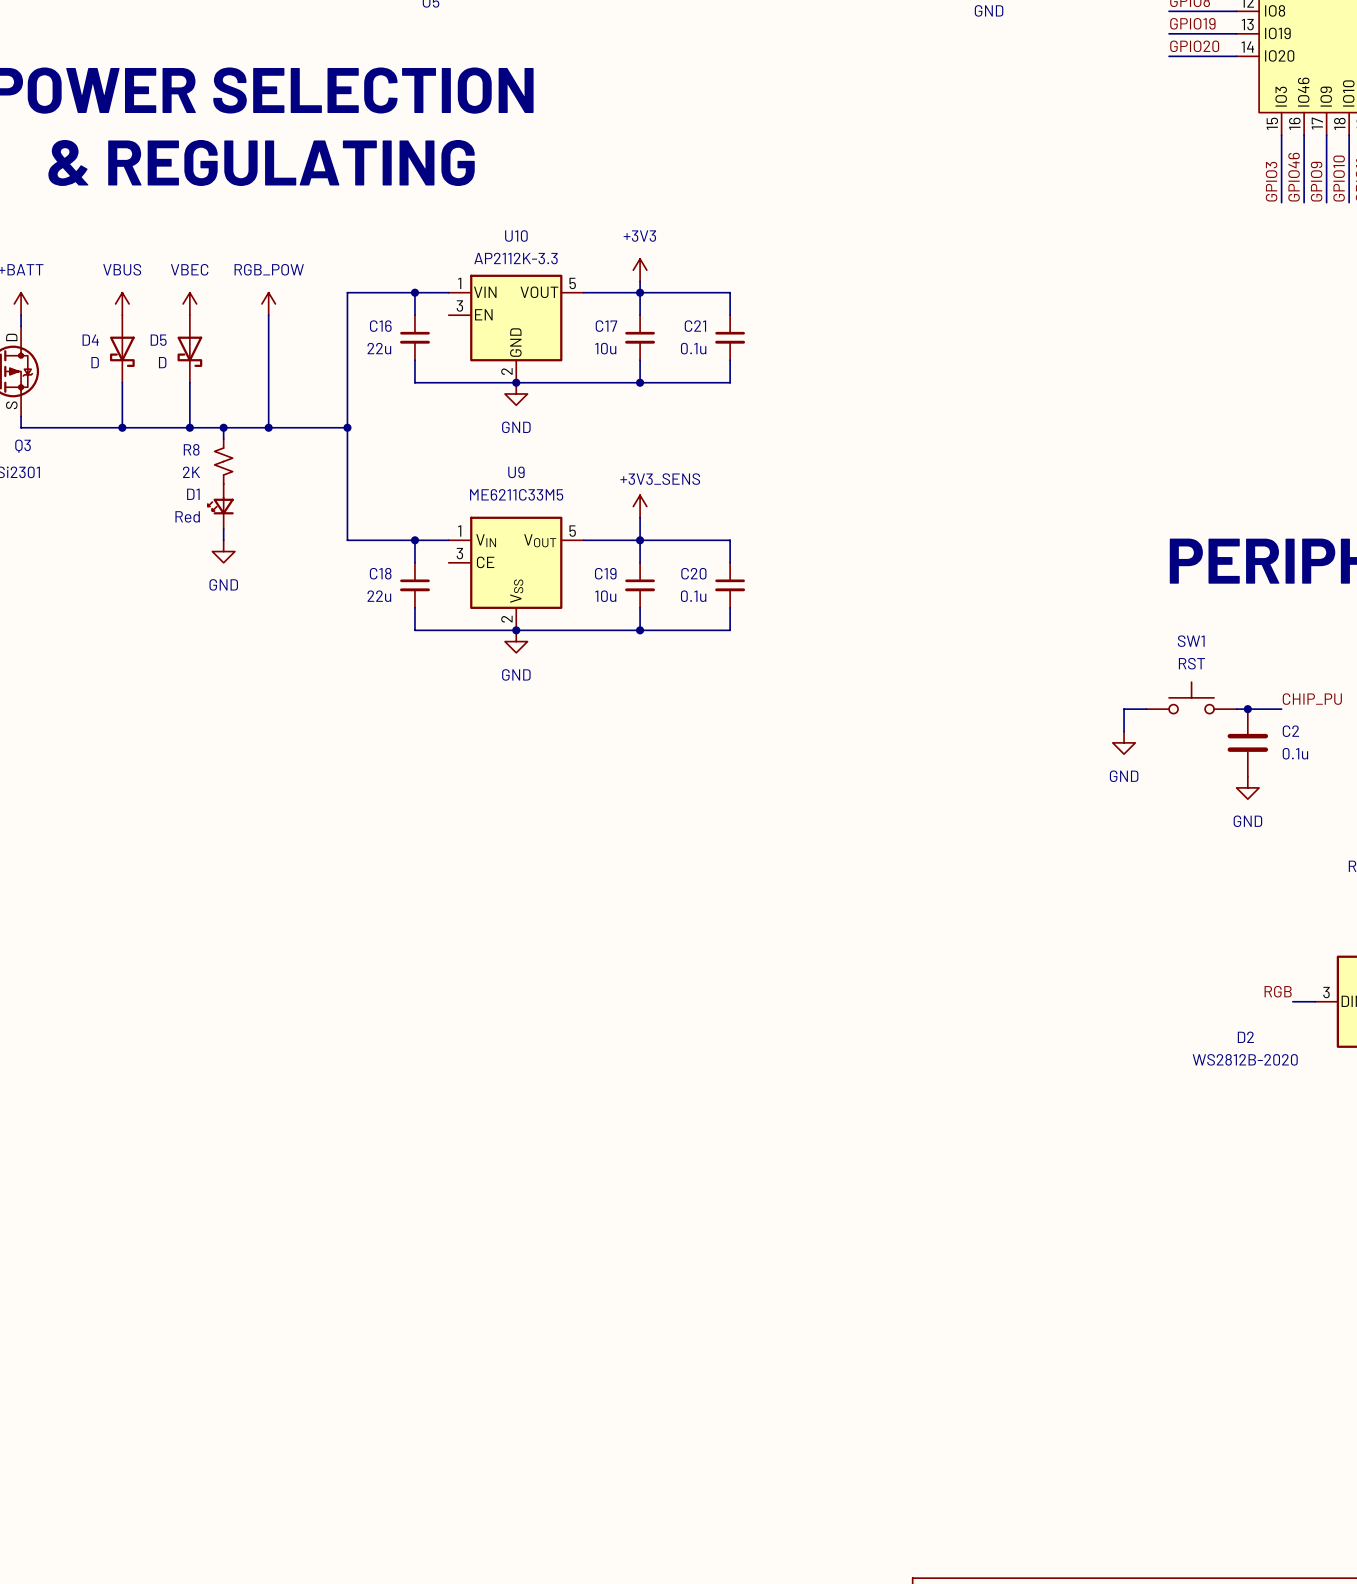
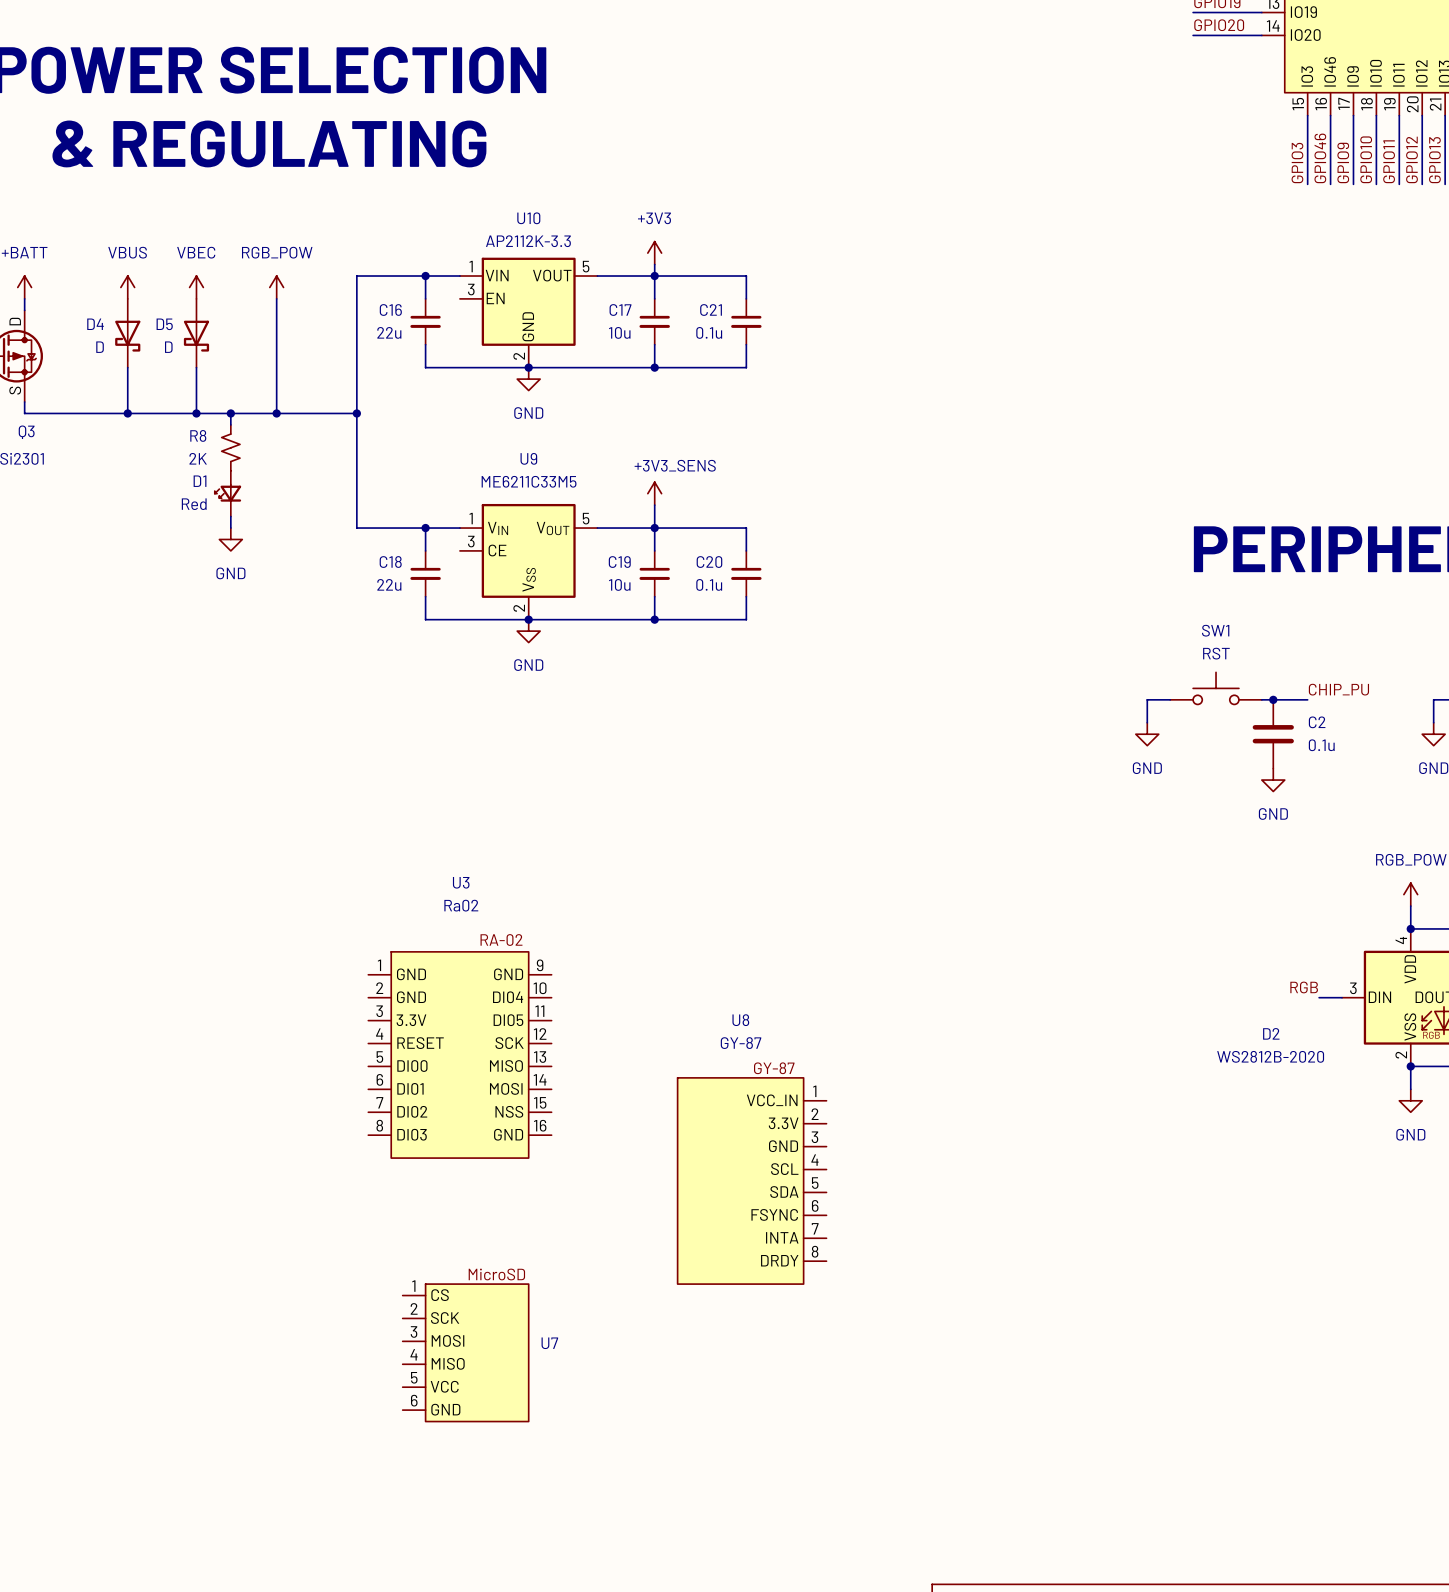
U3: none -> Ra02 (459, 1054)
U8: none -> GY-87 (752, 1180)
U7: none -> (465, 1352)

